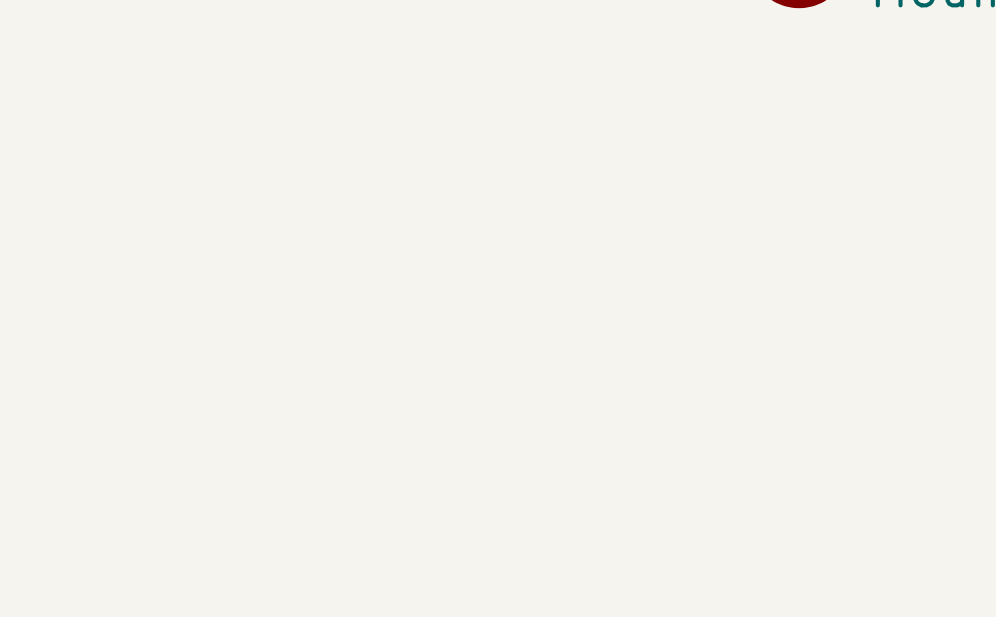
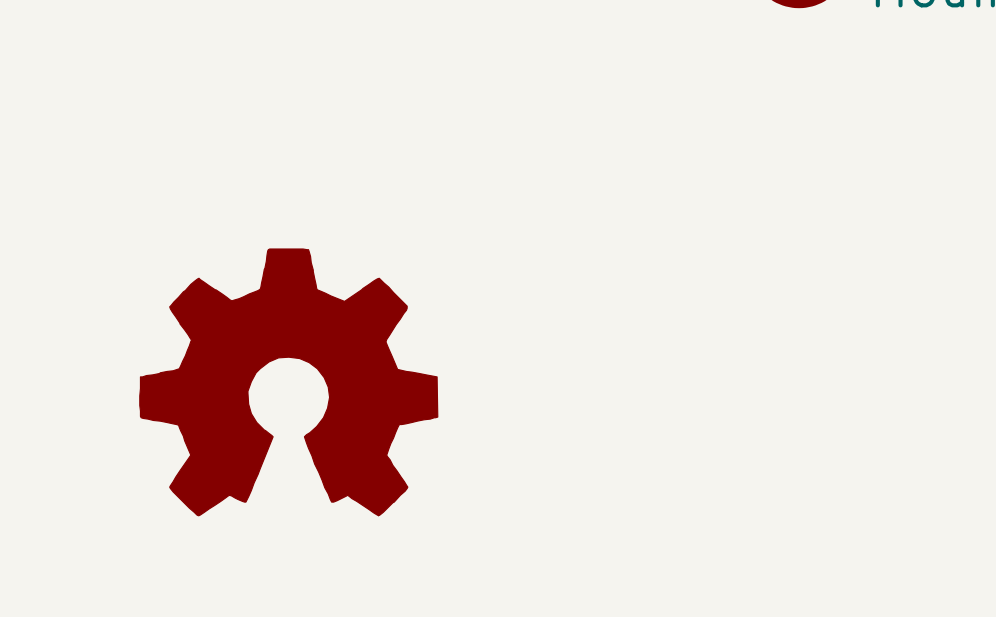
part: none -> (288, 382)

